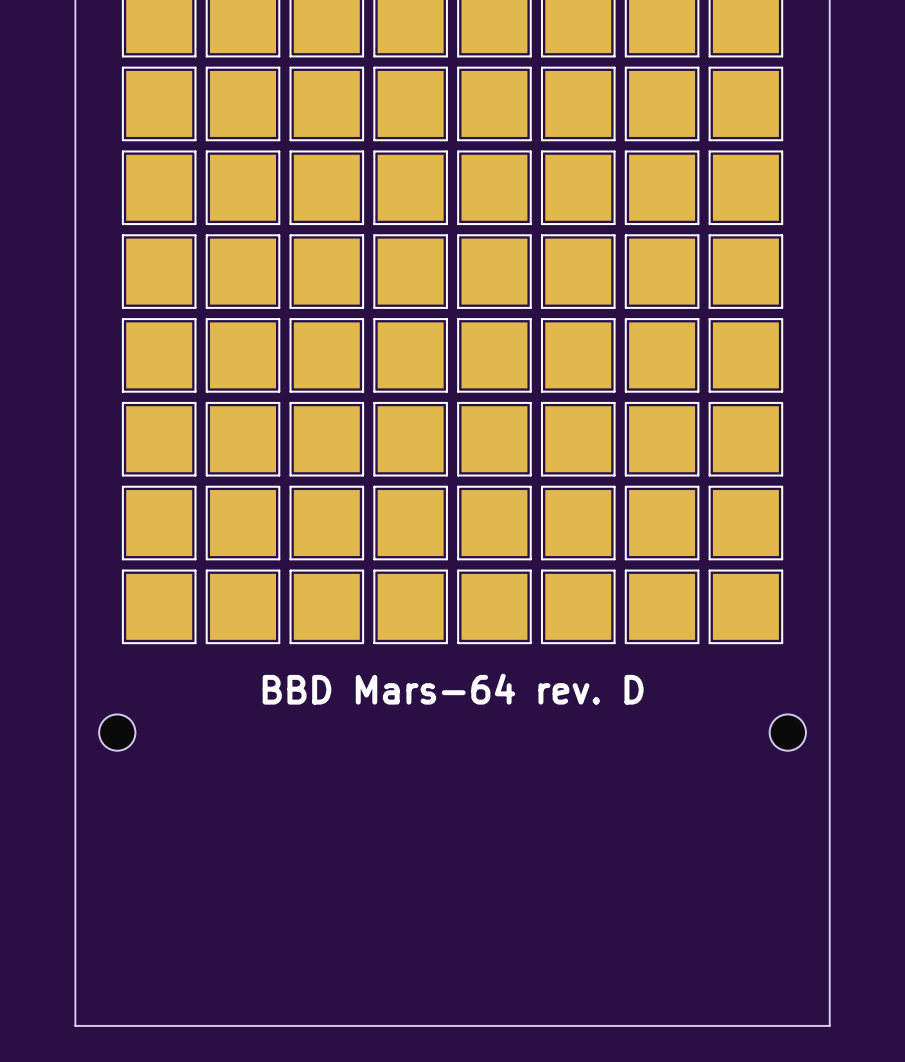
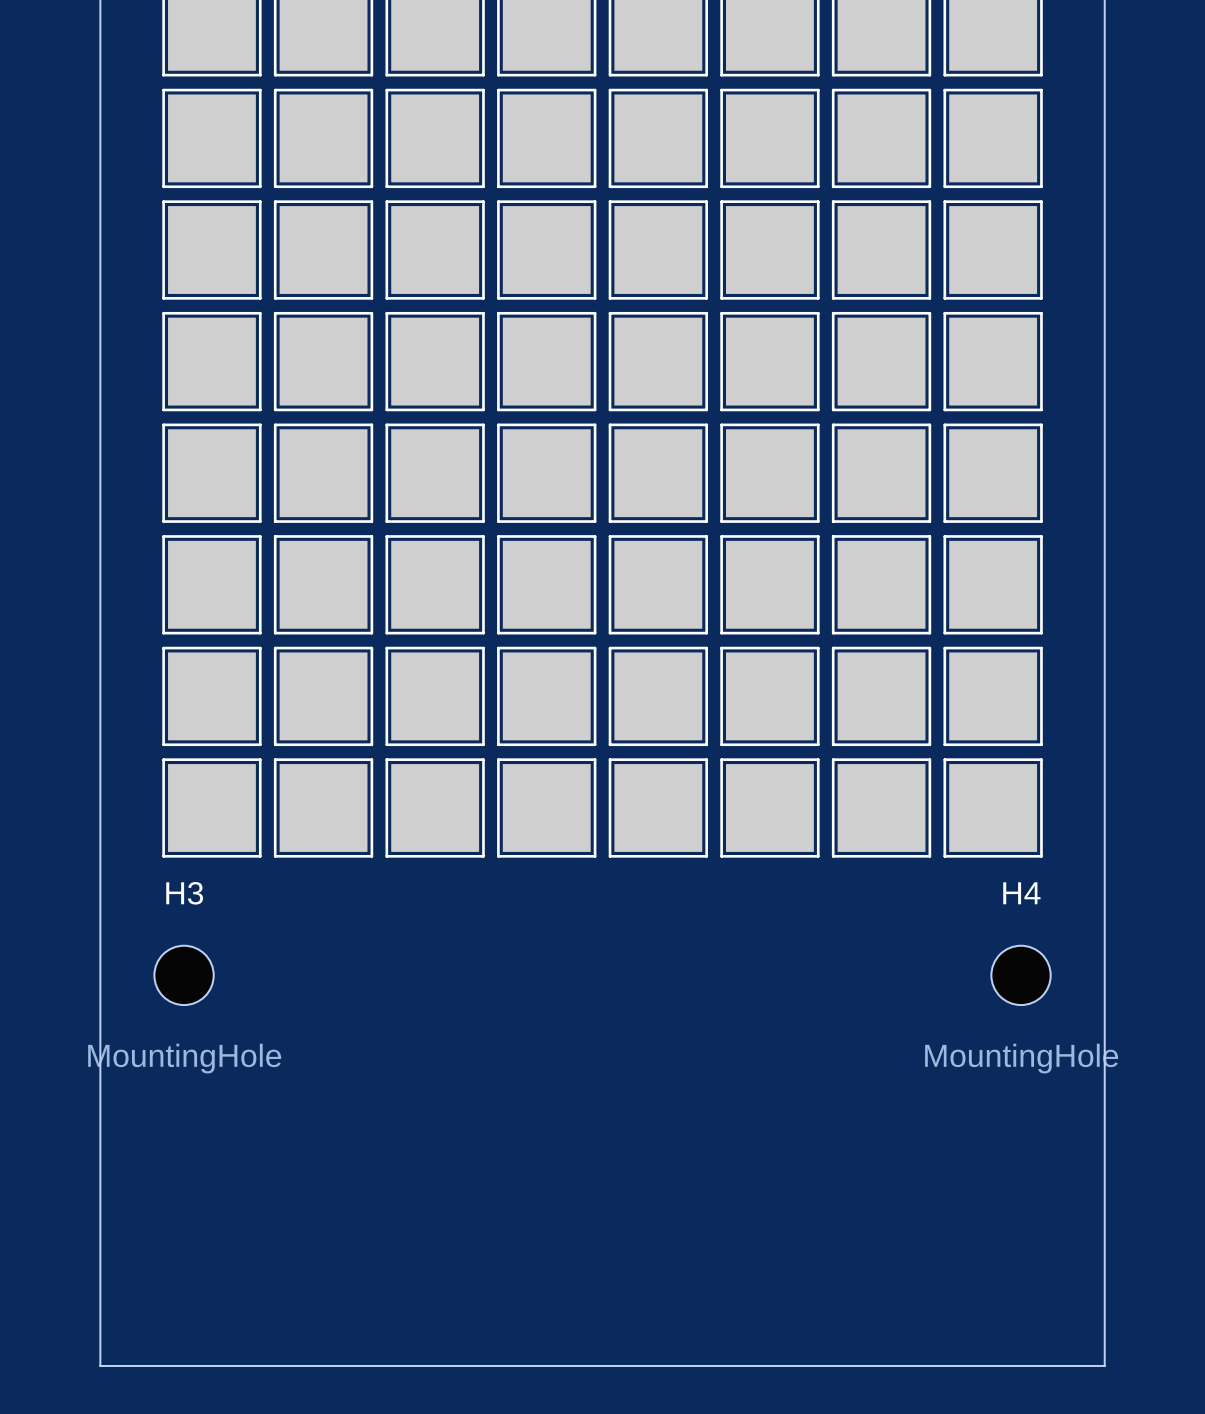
text: BBD Mars-64 rev. D (453, 689) -> none
part: (117, 732) -> none
H3: none -> MountingHole (184, 975)
H4: none -> MountingHole (1021, 975)
part: (787, 732) -> none

